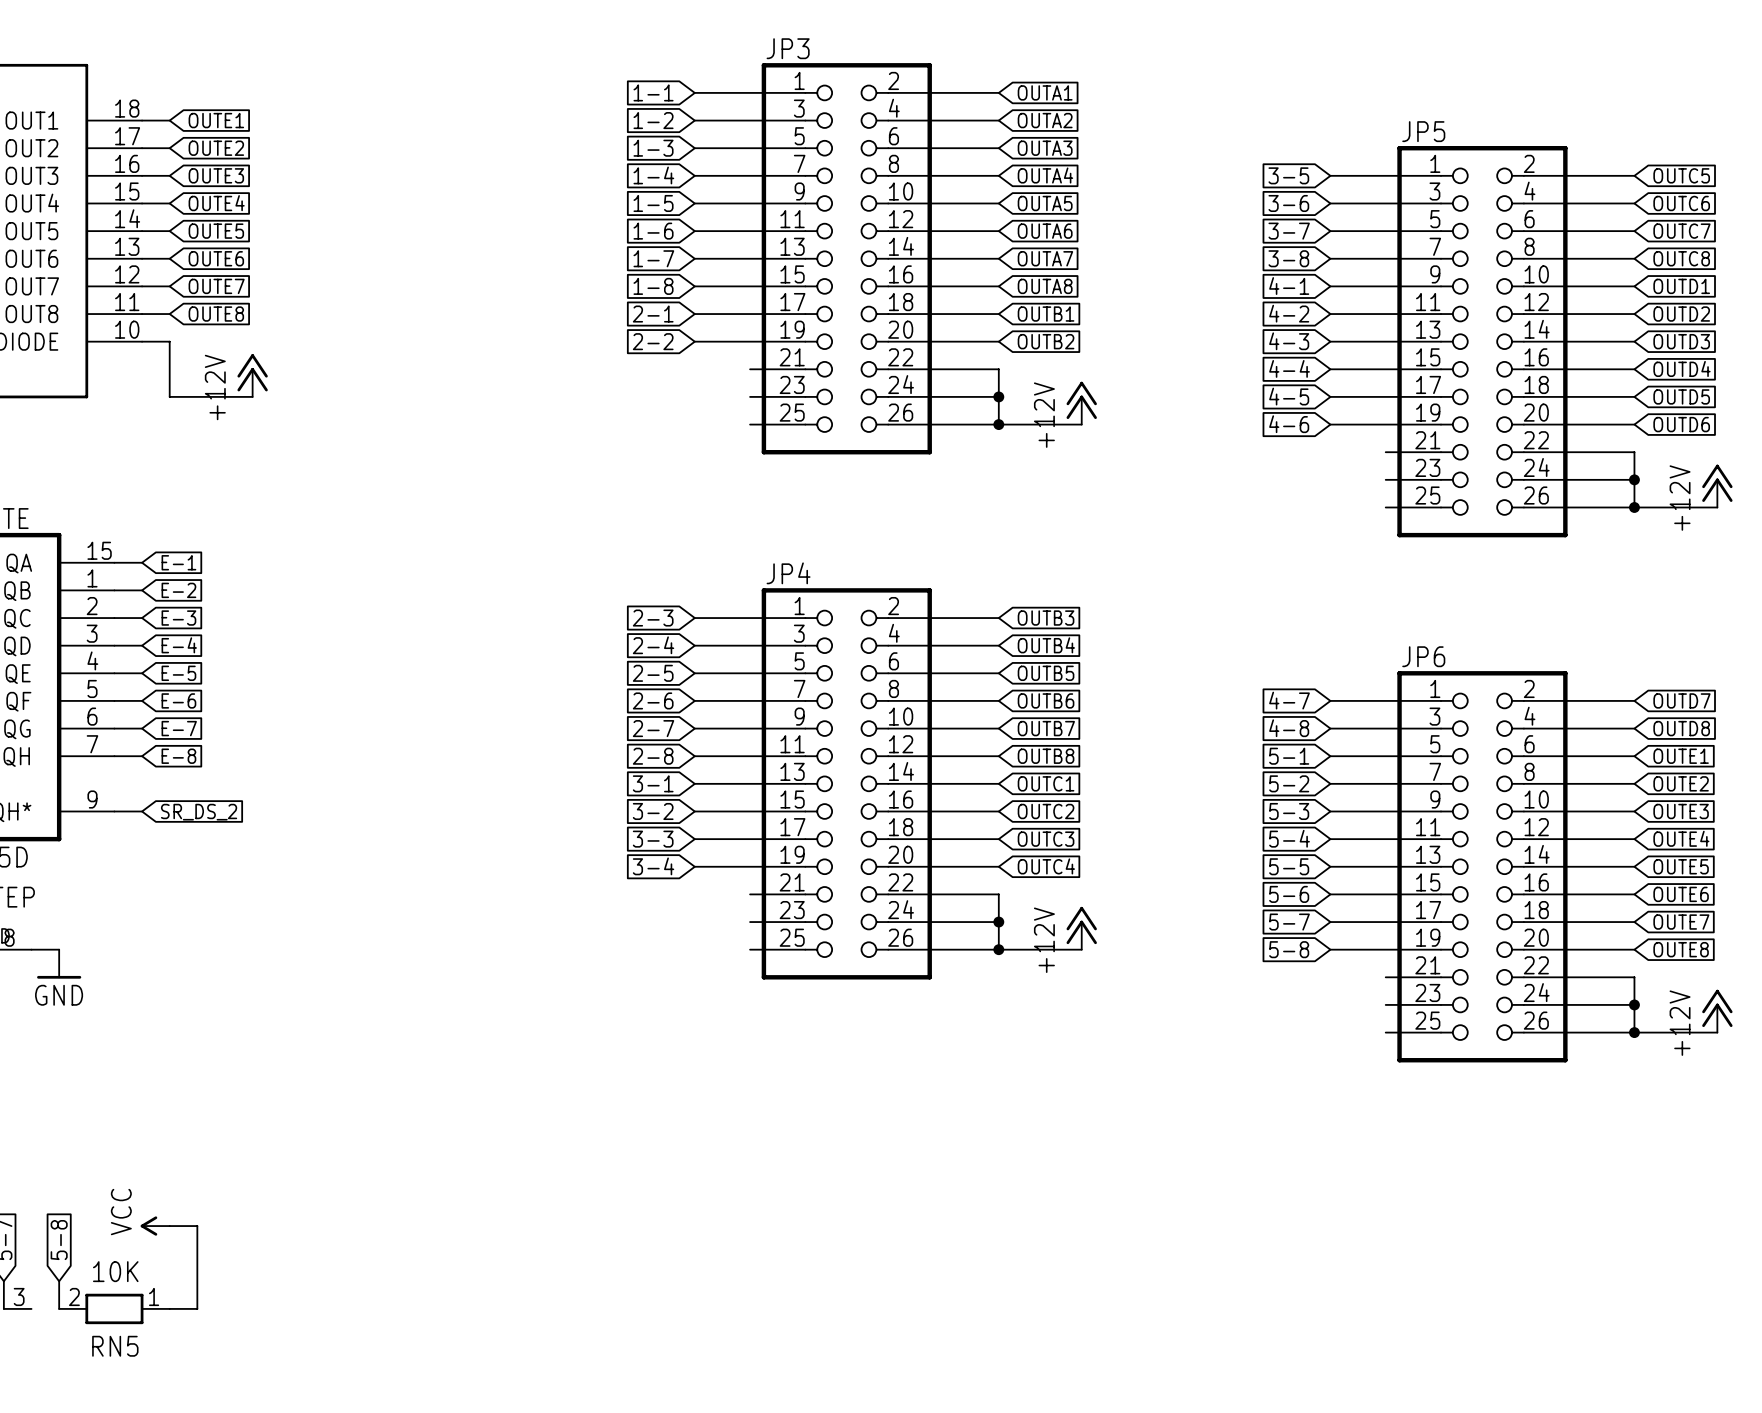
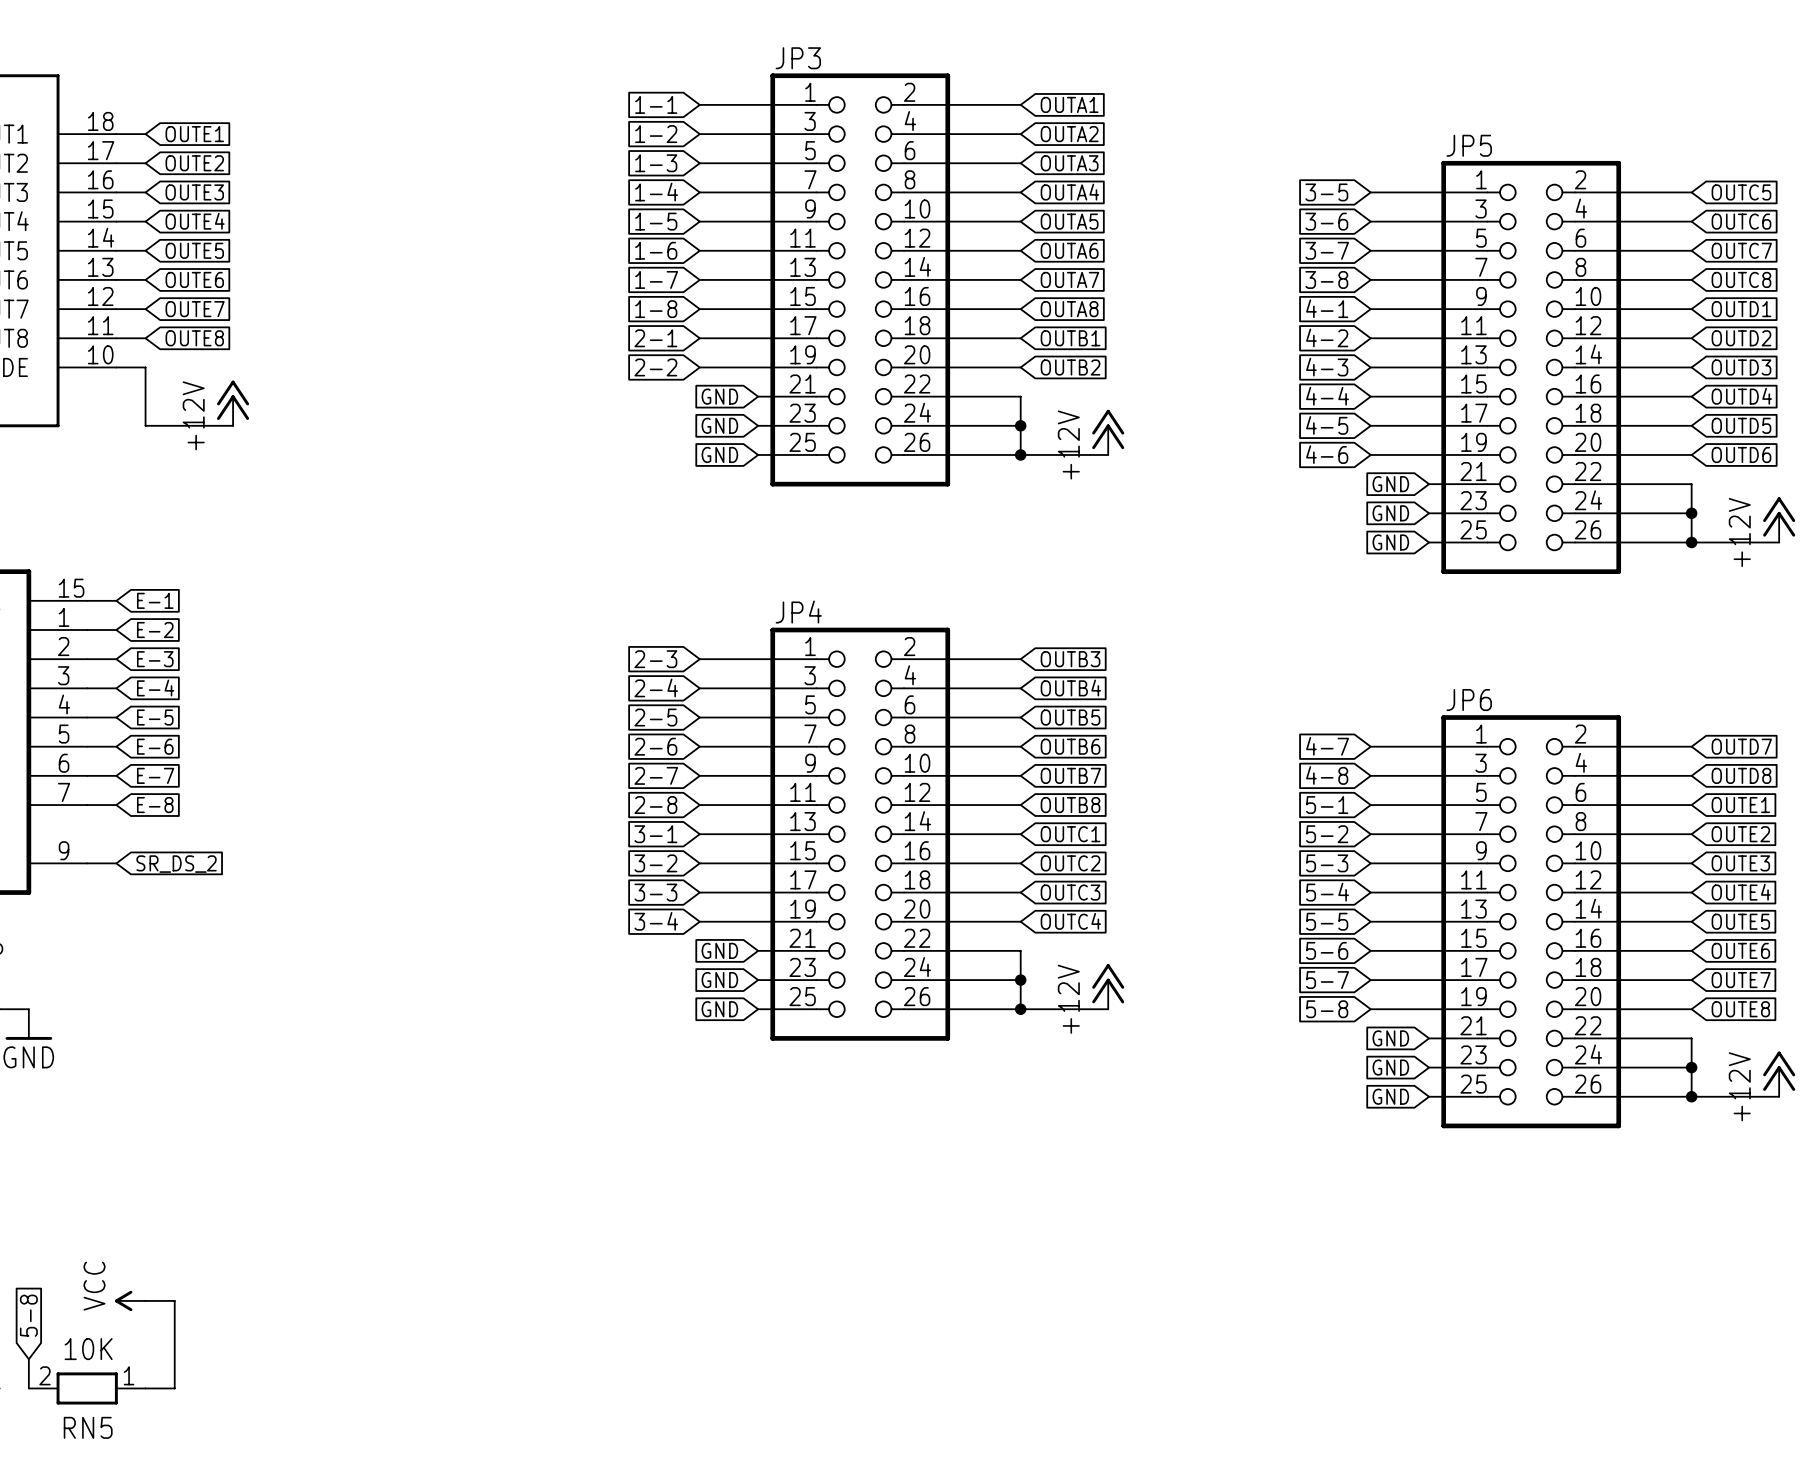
global label: none -> GND (719, 396)
global label: none -> GND (719, 425)
global label: none -> GND (719, 454)
global label: none -> GND (1390, 484)
global label: none -> GND (1390, 513)
global label: none -> GND (1390, 542)
global label: none -> GND (719, 950)
global label: none -> GND (719, 980)
global label: none -> GND (719, 1009)
global label: none -> GND (1390, 1038)
global label: none -> GND (1390, 1067)
global label: none -> GND (1390, 1096)

